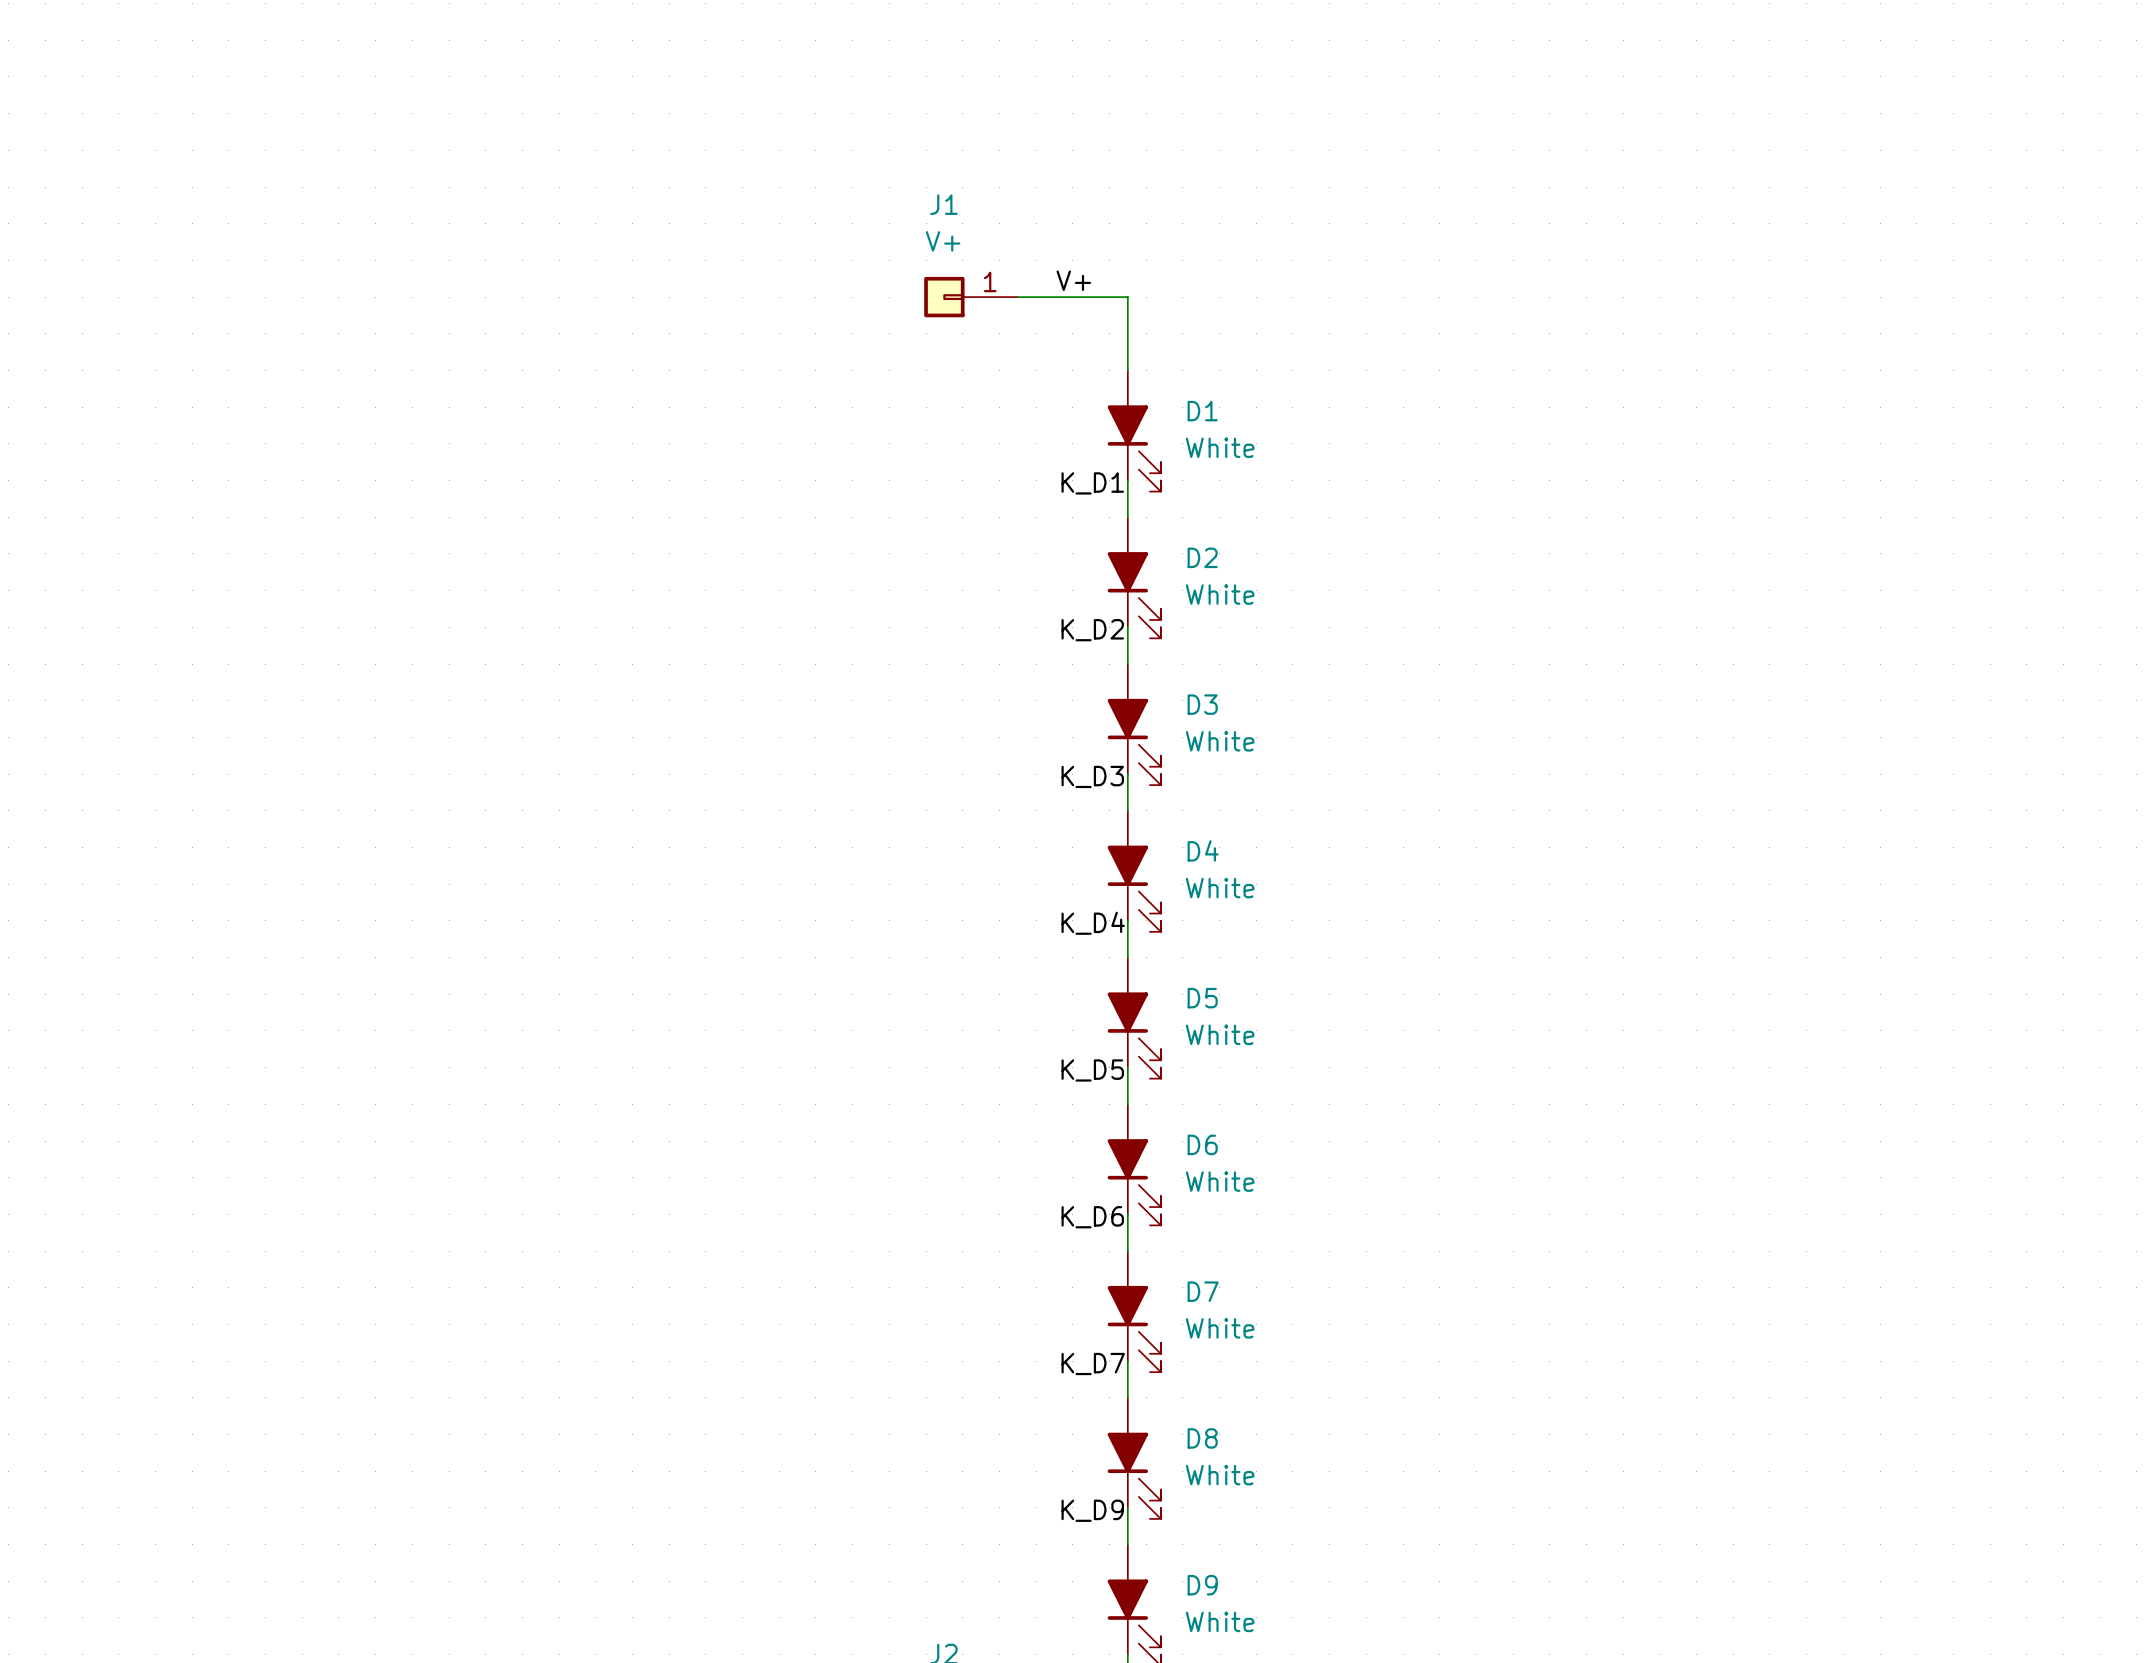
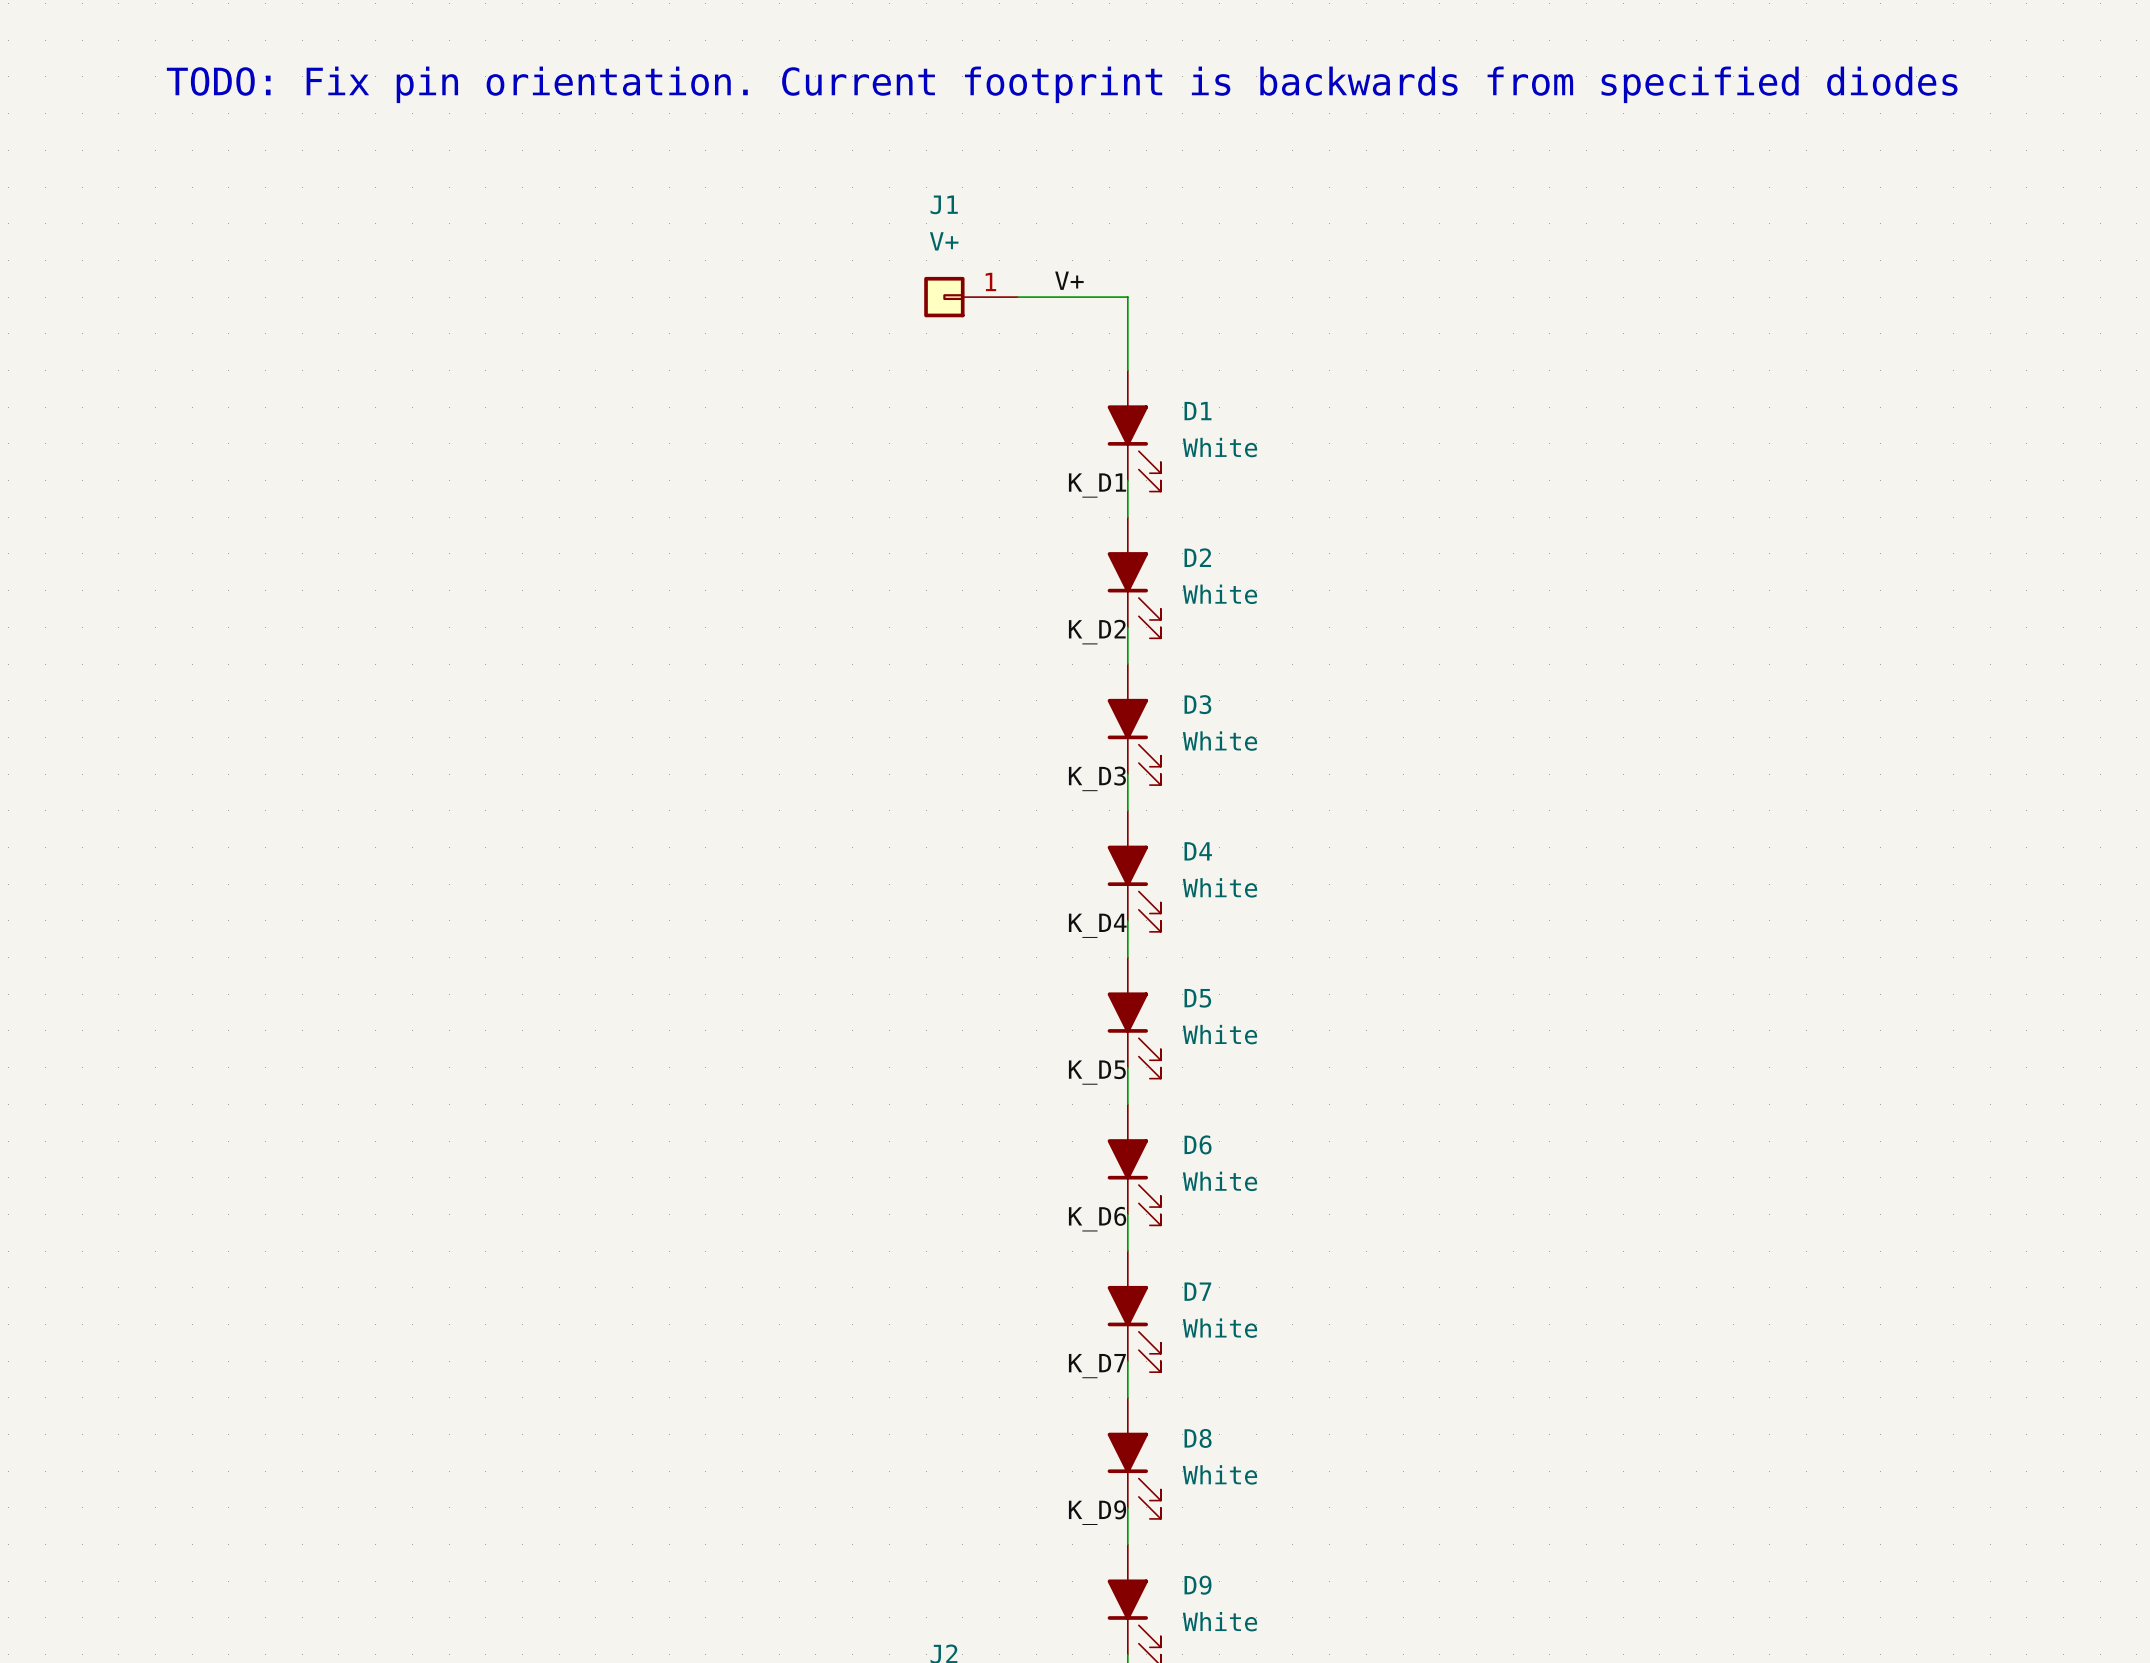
text: none -> TODO: Fix pin orientation. Current footprint is backwards from specified diodes (1062, 84)

